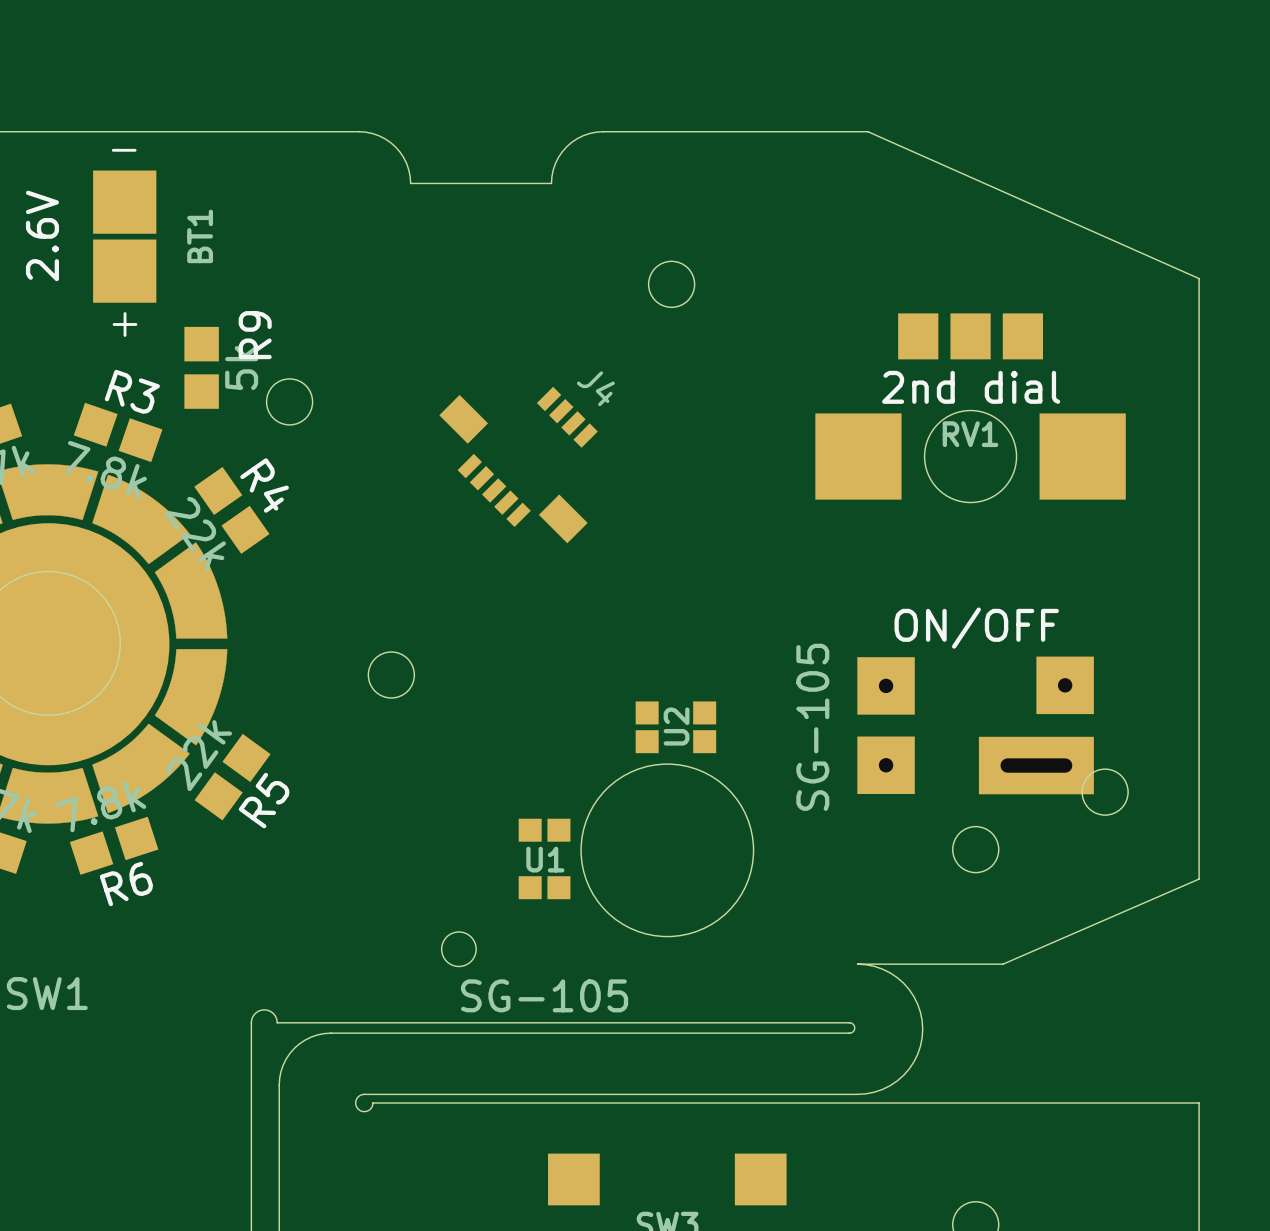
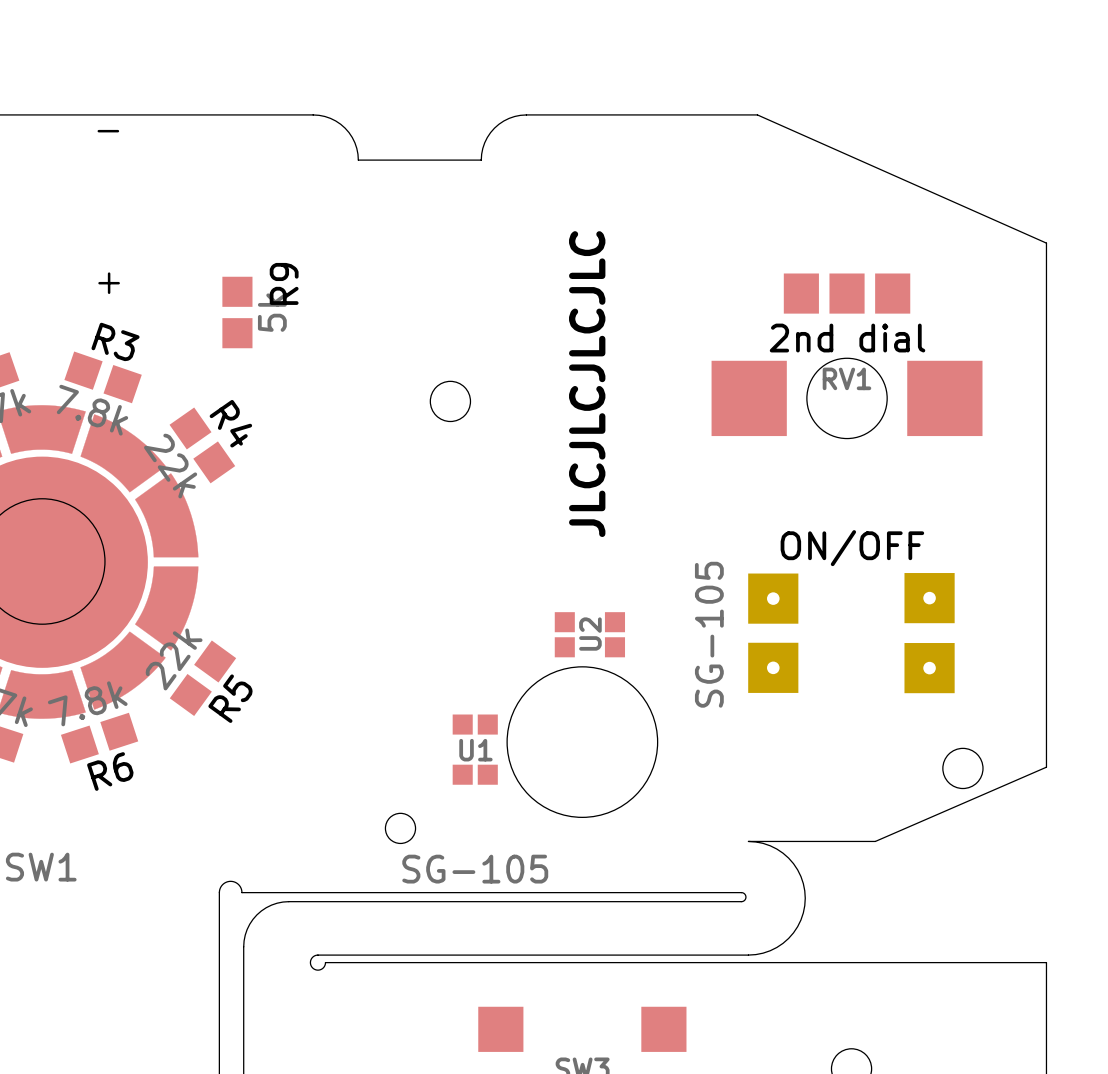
BT1: 2.6V (124, 236) -> none
round board edge: [647, 260, 696, 309] -> none
R9 position: (201, 367) -> (237, 312)
round board edge: [265, 378, 314, 426] -> none
round board edge: none -> [429, 380, 472, 423]
text: none -> JLCJLCJLCJLC (587, 384)
J4: (518, 465) -> none
round board edge: [367, 651, 416, 699] -> none
part footprint: [857, 656, 1094, 795] -> [748, 573, 955, 694]
round board edge: [1081, 768, 1129, 816] -> none
round board edge: [952, 825, 1000, 874] -> none
round board edge: none -> [942, 747, 984, 790]

